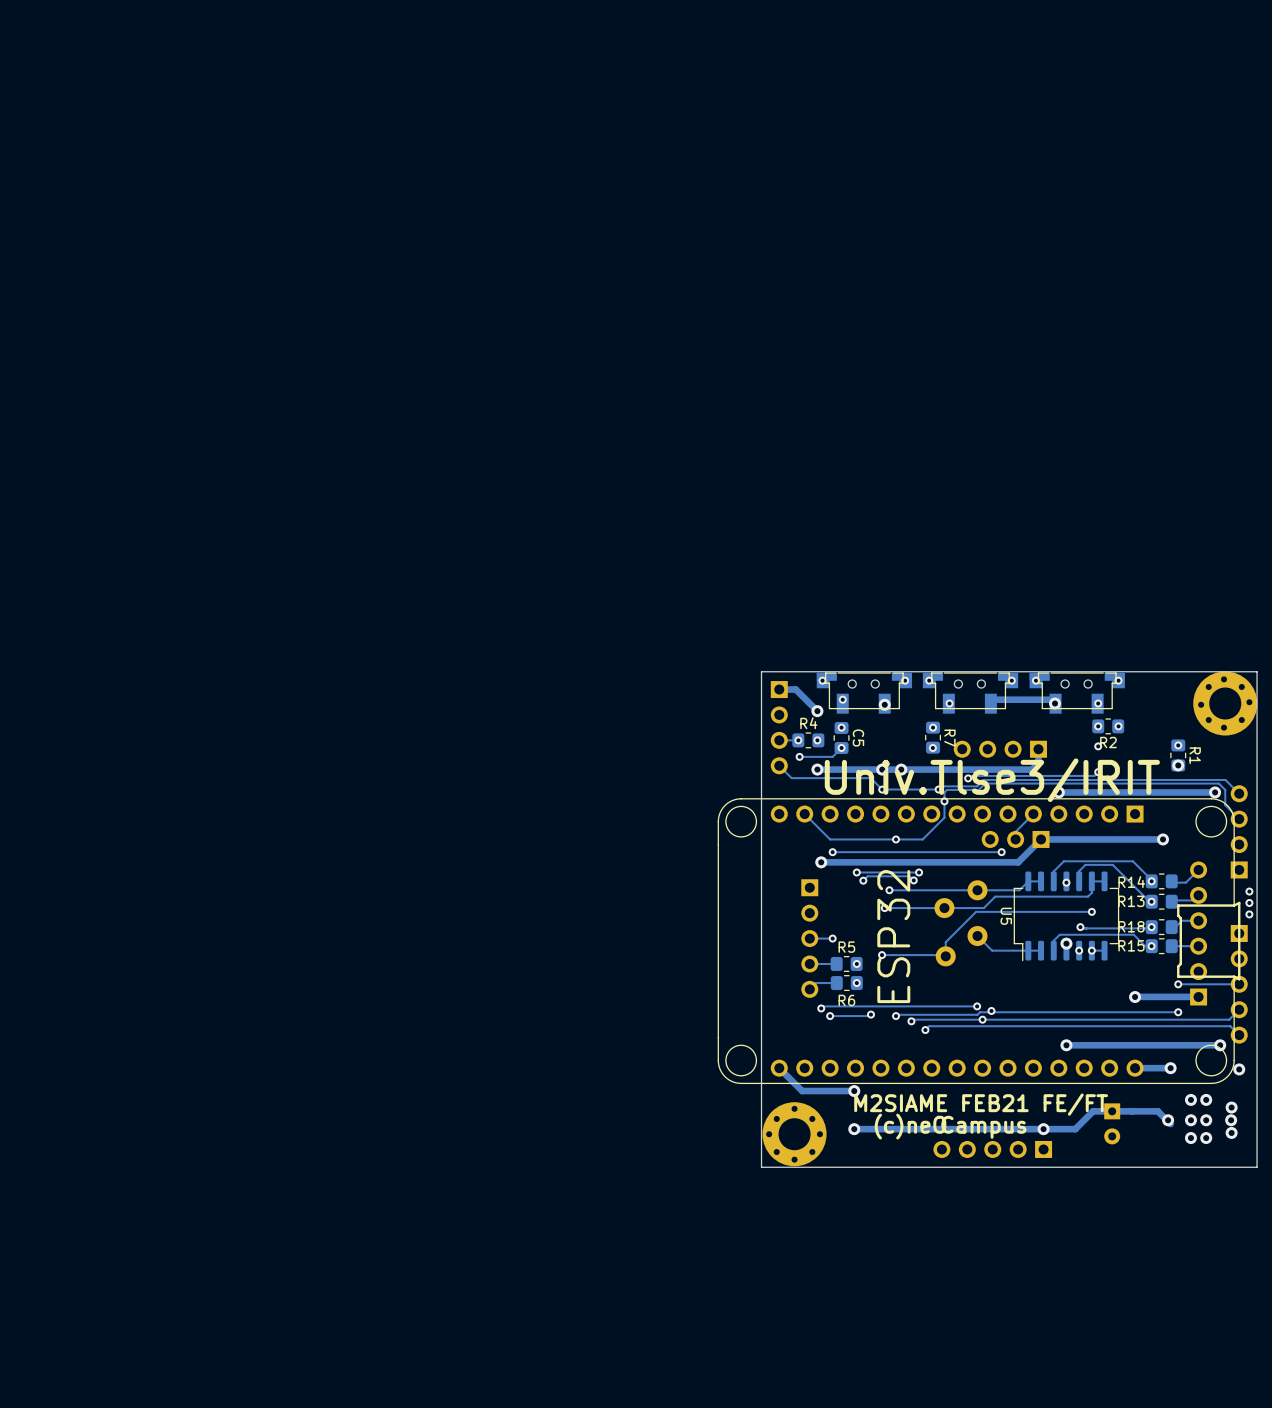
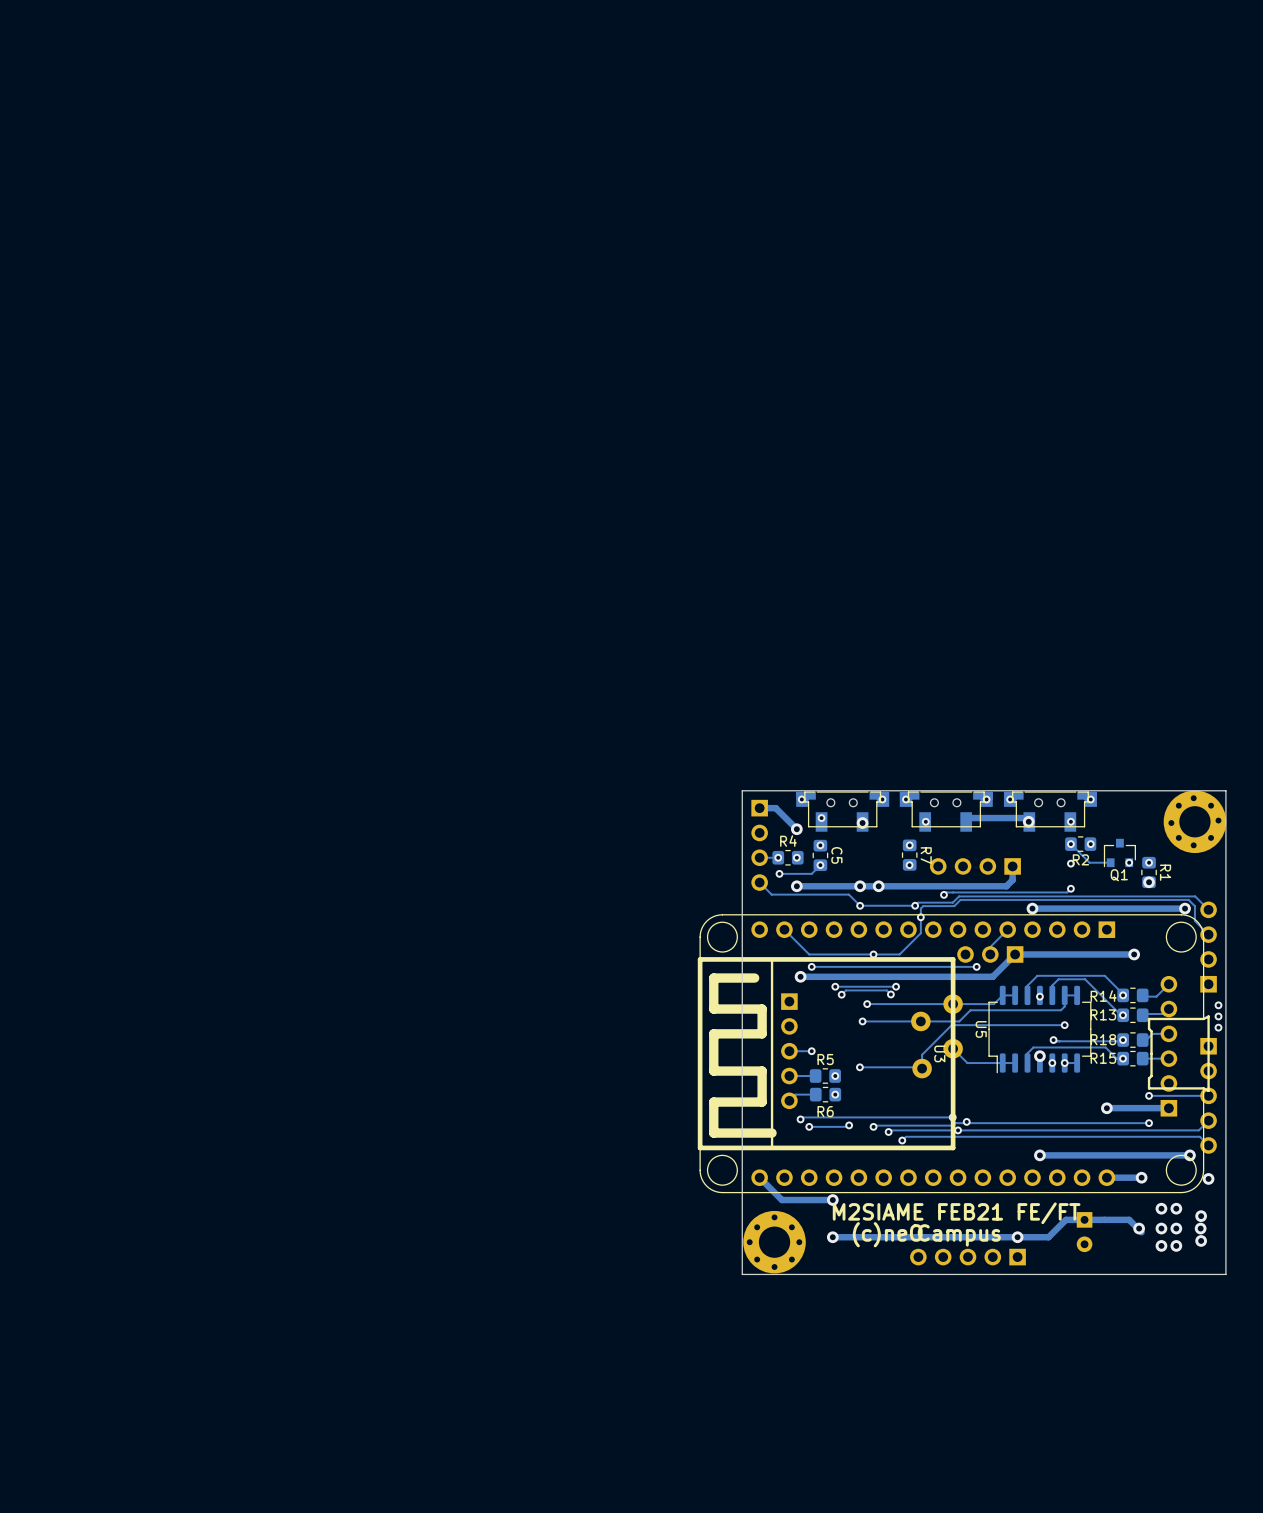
track: none -> (1070, 844) (1089, 862) (1110, 862)
Q1: none -> (1119, 852)
via: none -> (1129, 862)
text: Univ.Tlse3/IRIT (992, 780) -> none
text: ESP32 (893, 936) -> none
U3: none -> (953, 1053)
part: (979, 941) -> none

